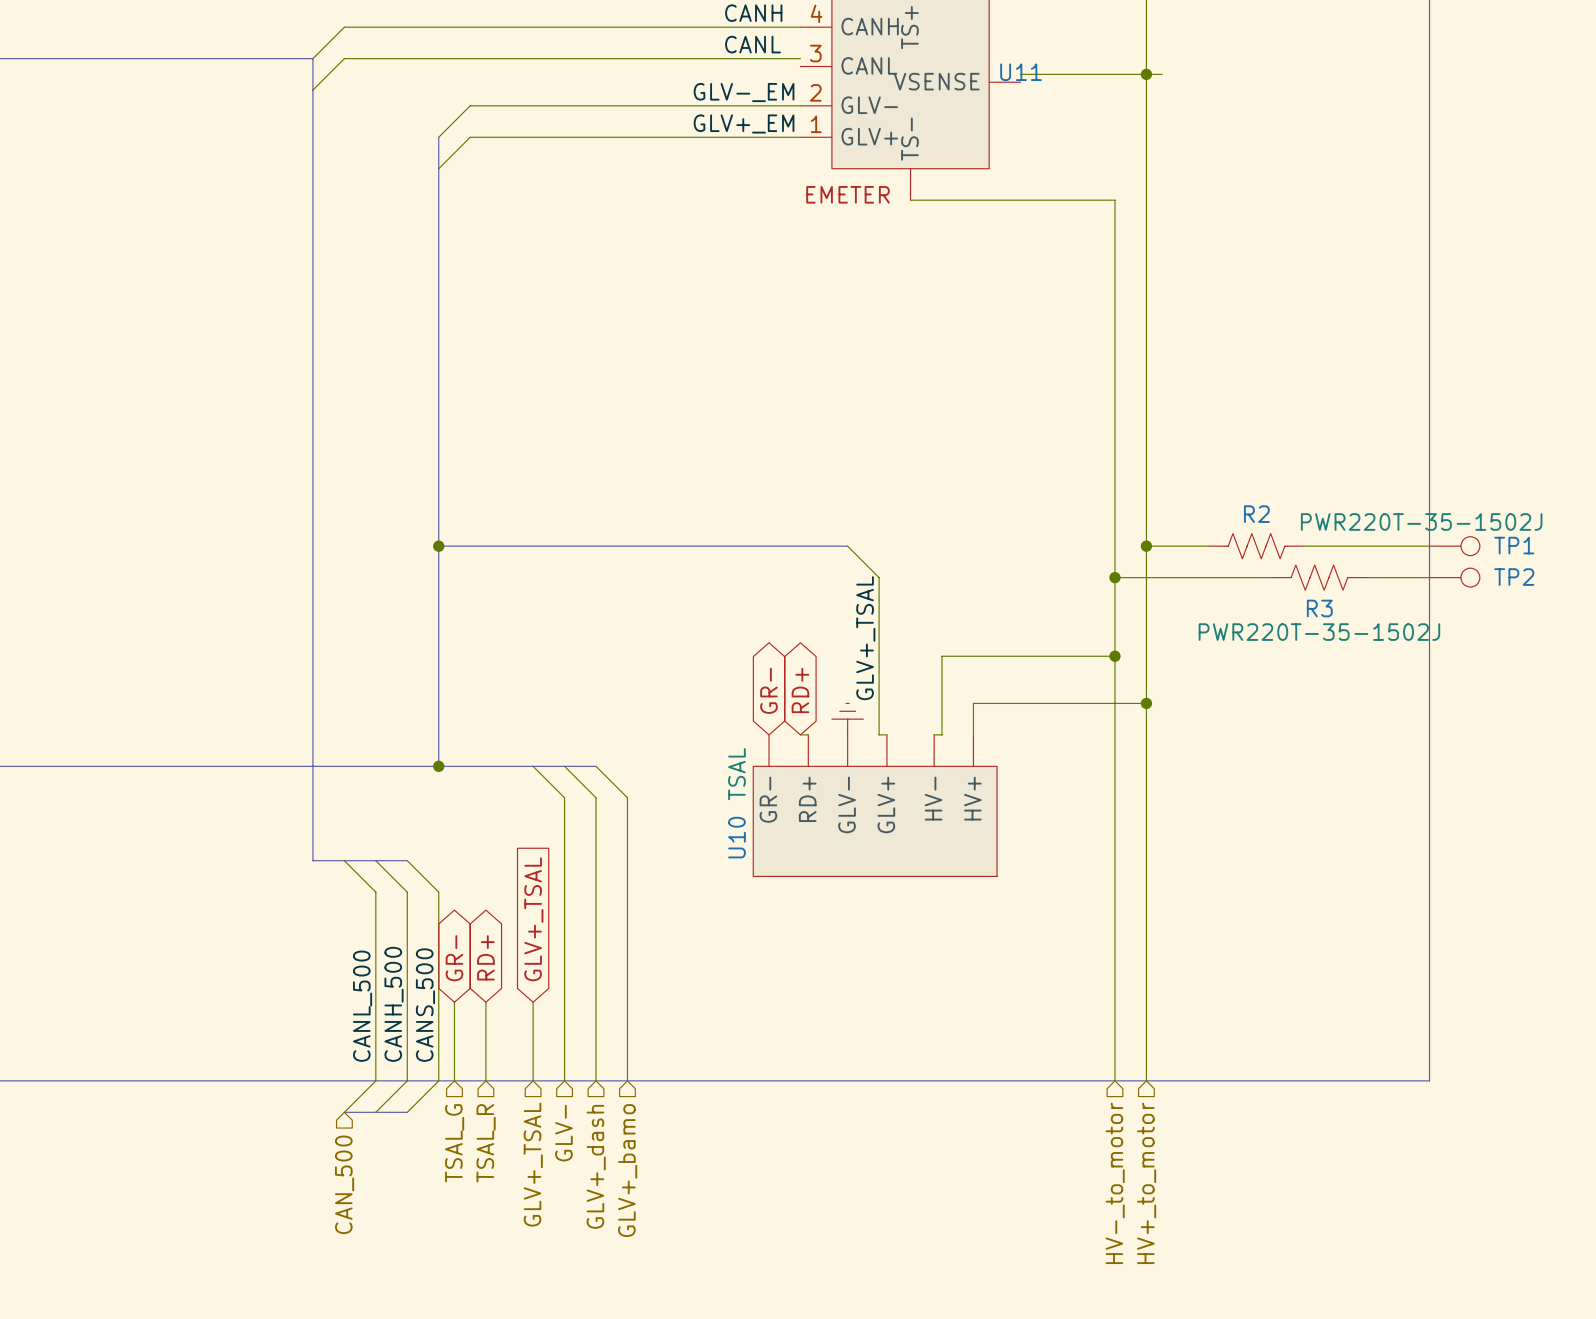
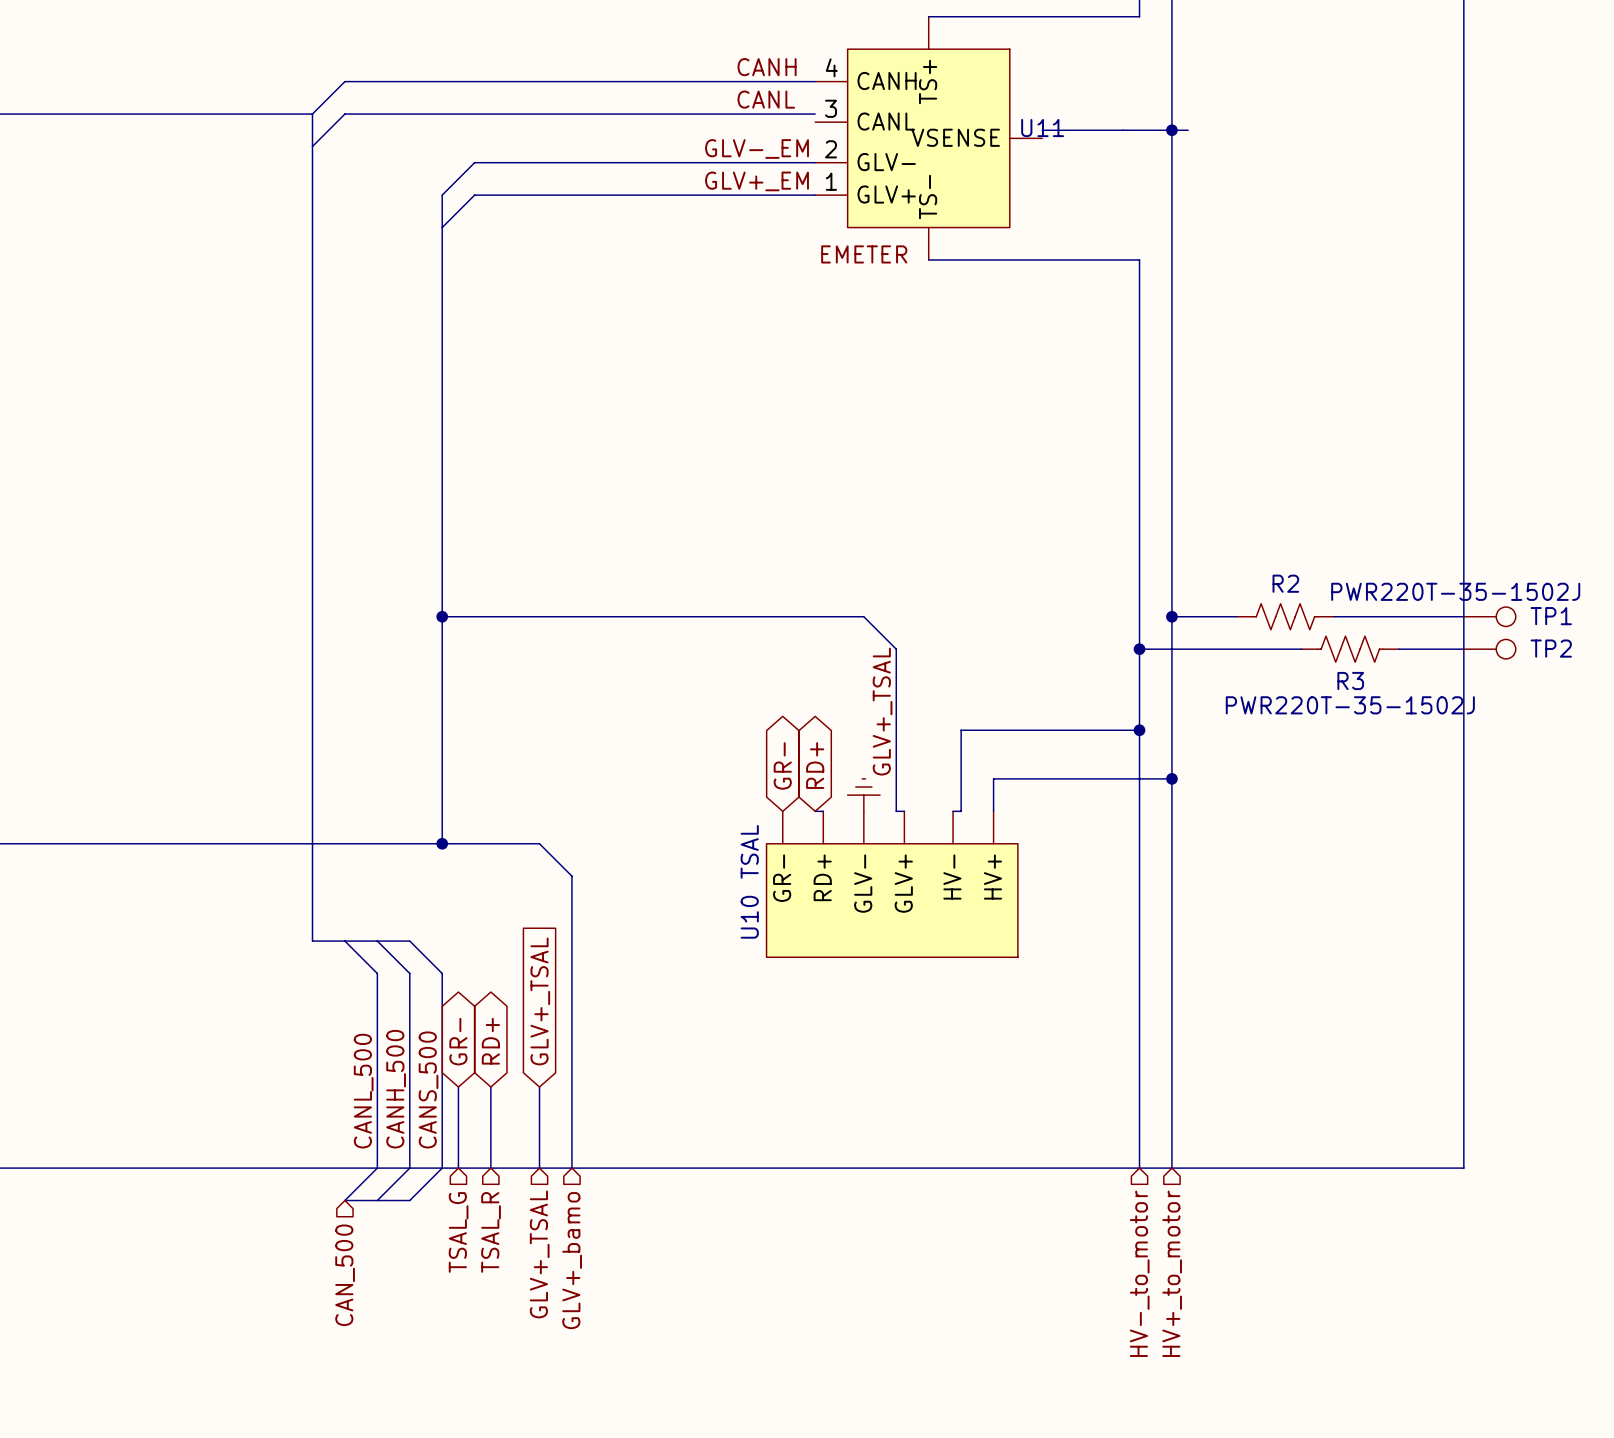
bus: (533, 766) (596, 766) -> none
wire: (564, 766) (596, 797) (596, 1080) -> none
wire: (596, 766) (627, 797) (627, 1080) -> none
hierarchical label: GLV- (563, 1133) -> GLV+_bamo (572, 1260)
hierarchical label: GLV+_dash (596, 1166) -> none
hierarchical label: GLV+_bamo (627, 1170) -> none

